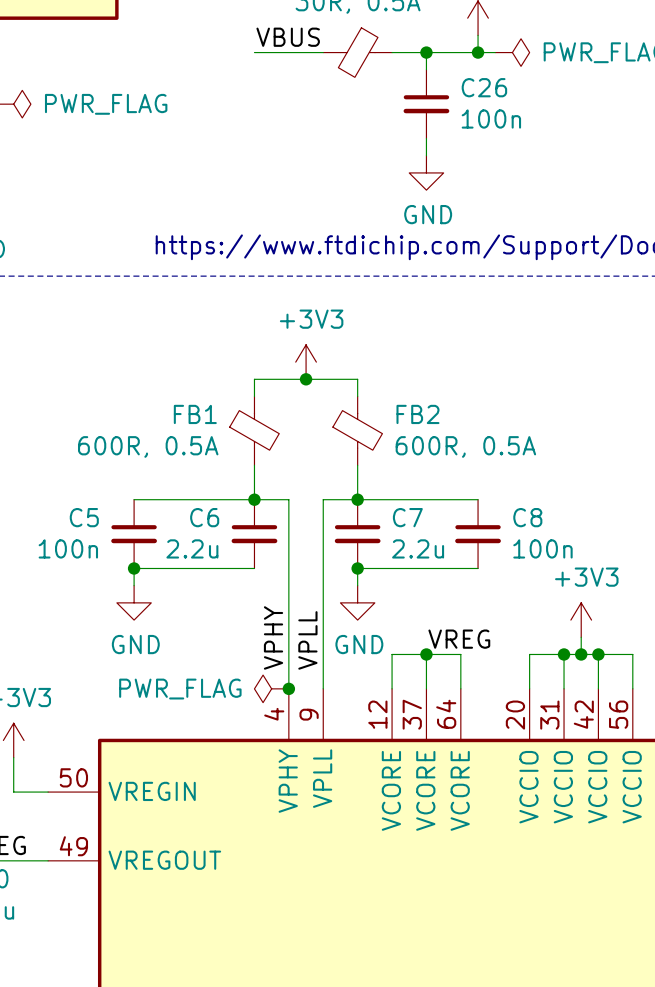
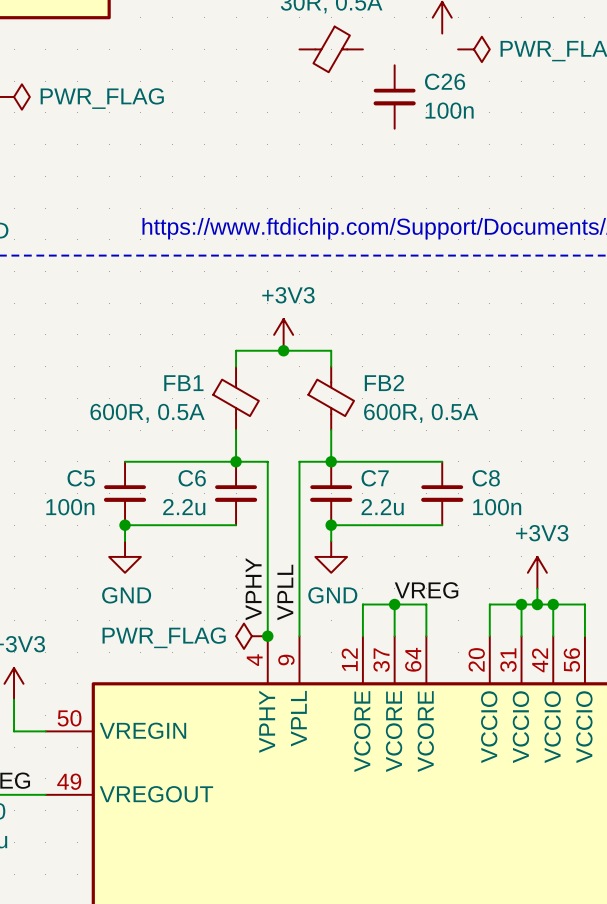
wire: (478, 35) (478, 52) -> none
label: VBUS (288, 37) -> none
wire: (254, 52) (323, 52) -> none
wire: (392, 52) (495, 52) -> none
wire: (426, 52) (426, 69) -> none
junction: (426, 52) -> none
junction: (478, 52) -> none
wire: (426, 138) (426, 155) -> none
power symbol: GND (426, 172) -> none

